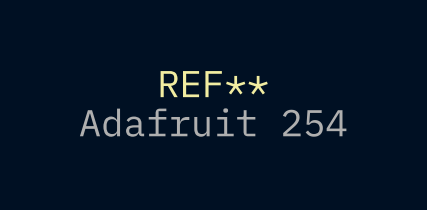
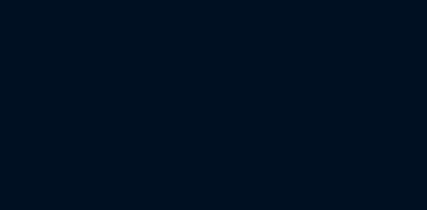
REF**: Adafruit 254 (213, 103) -> none

